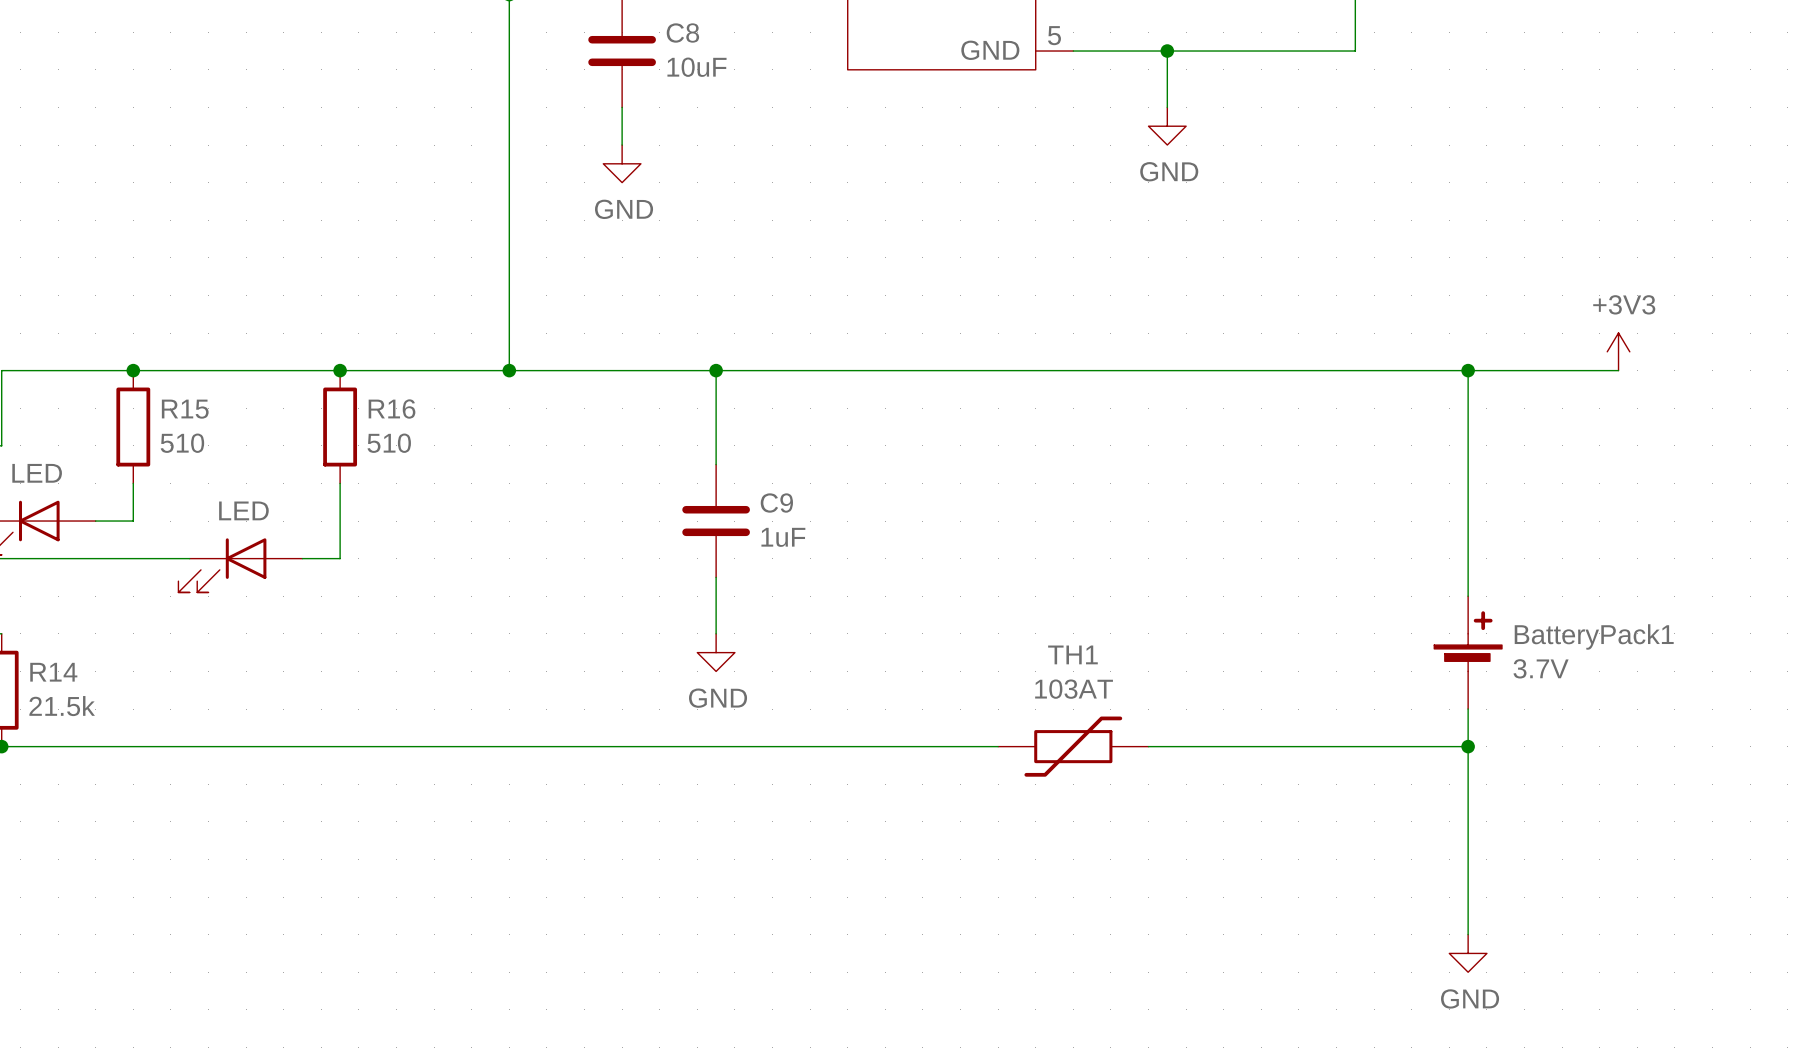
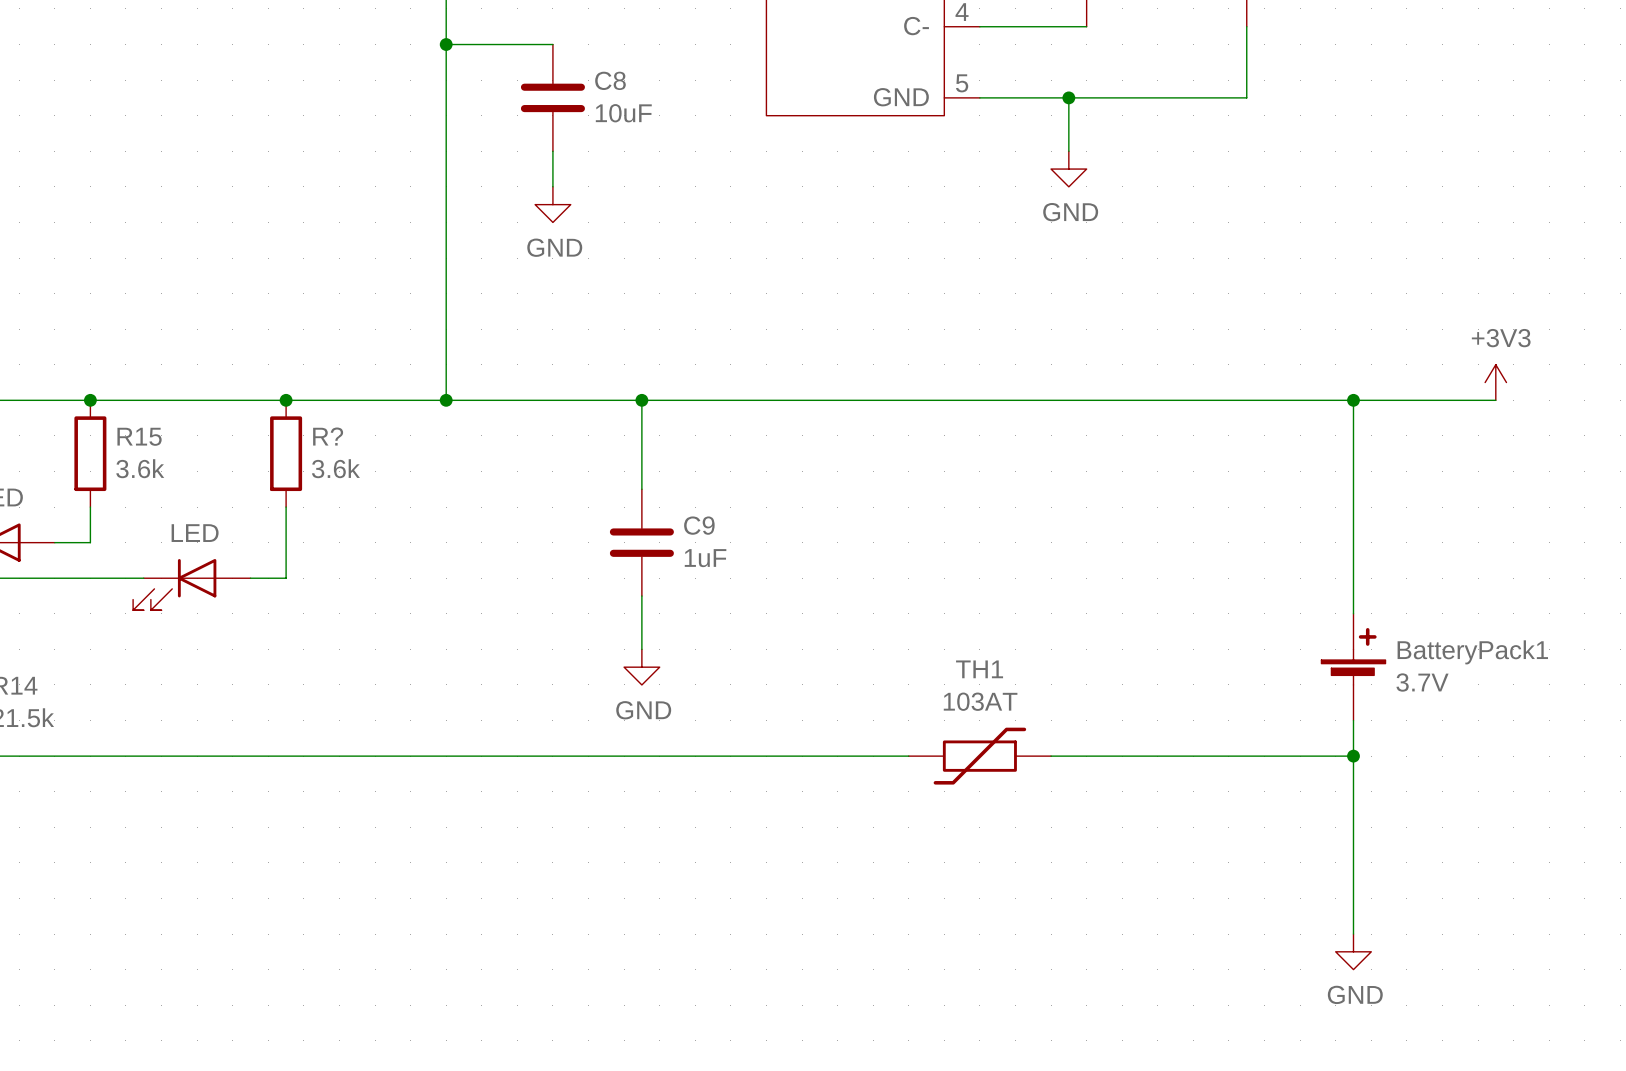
R16 name: R16 (392, 409) -> R? (328, 436)
R15 value: 510 (182, 443) -> 3.6k (140, 468)
R16 value: 510 (389, 443) -> 3.6k (335, 468)

